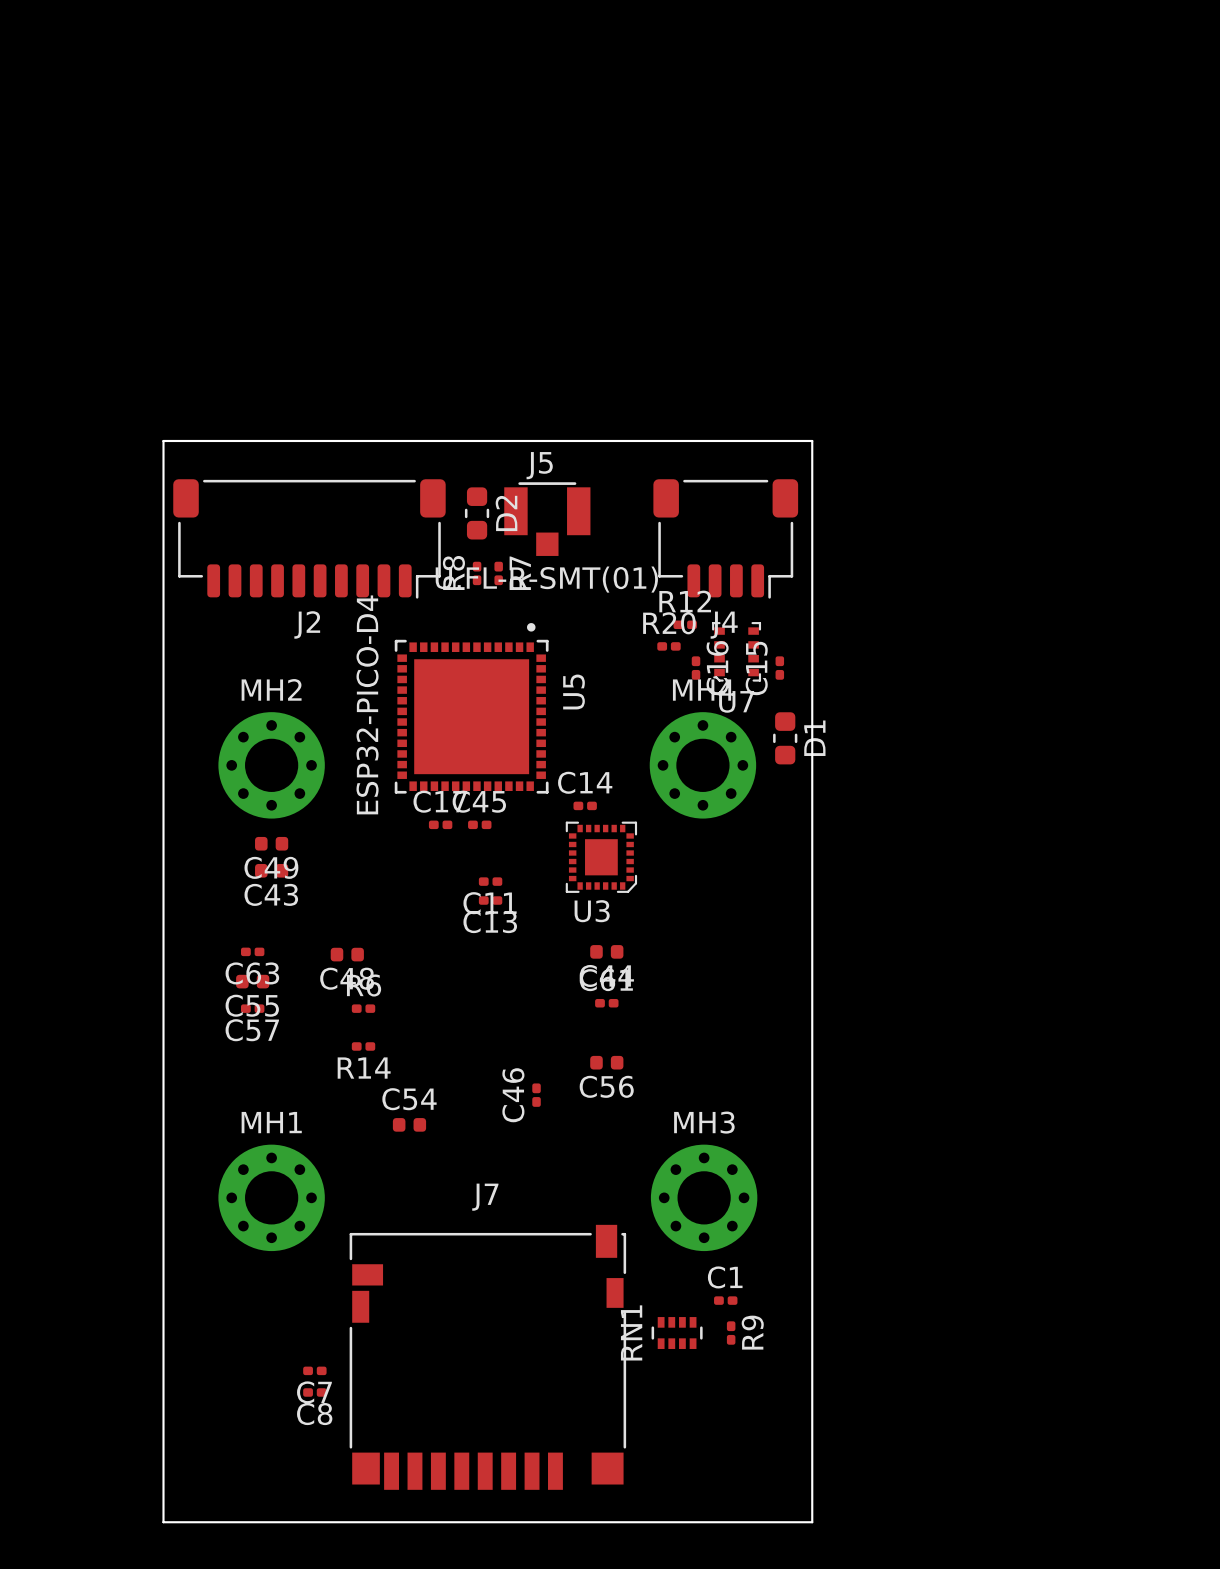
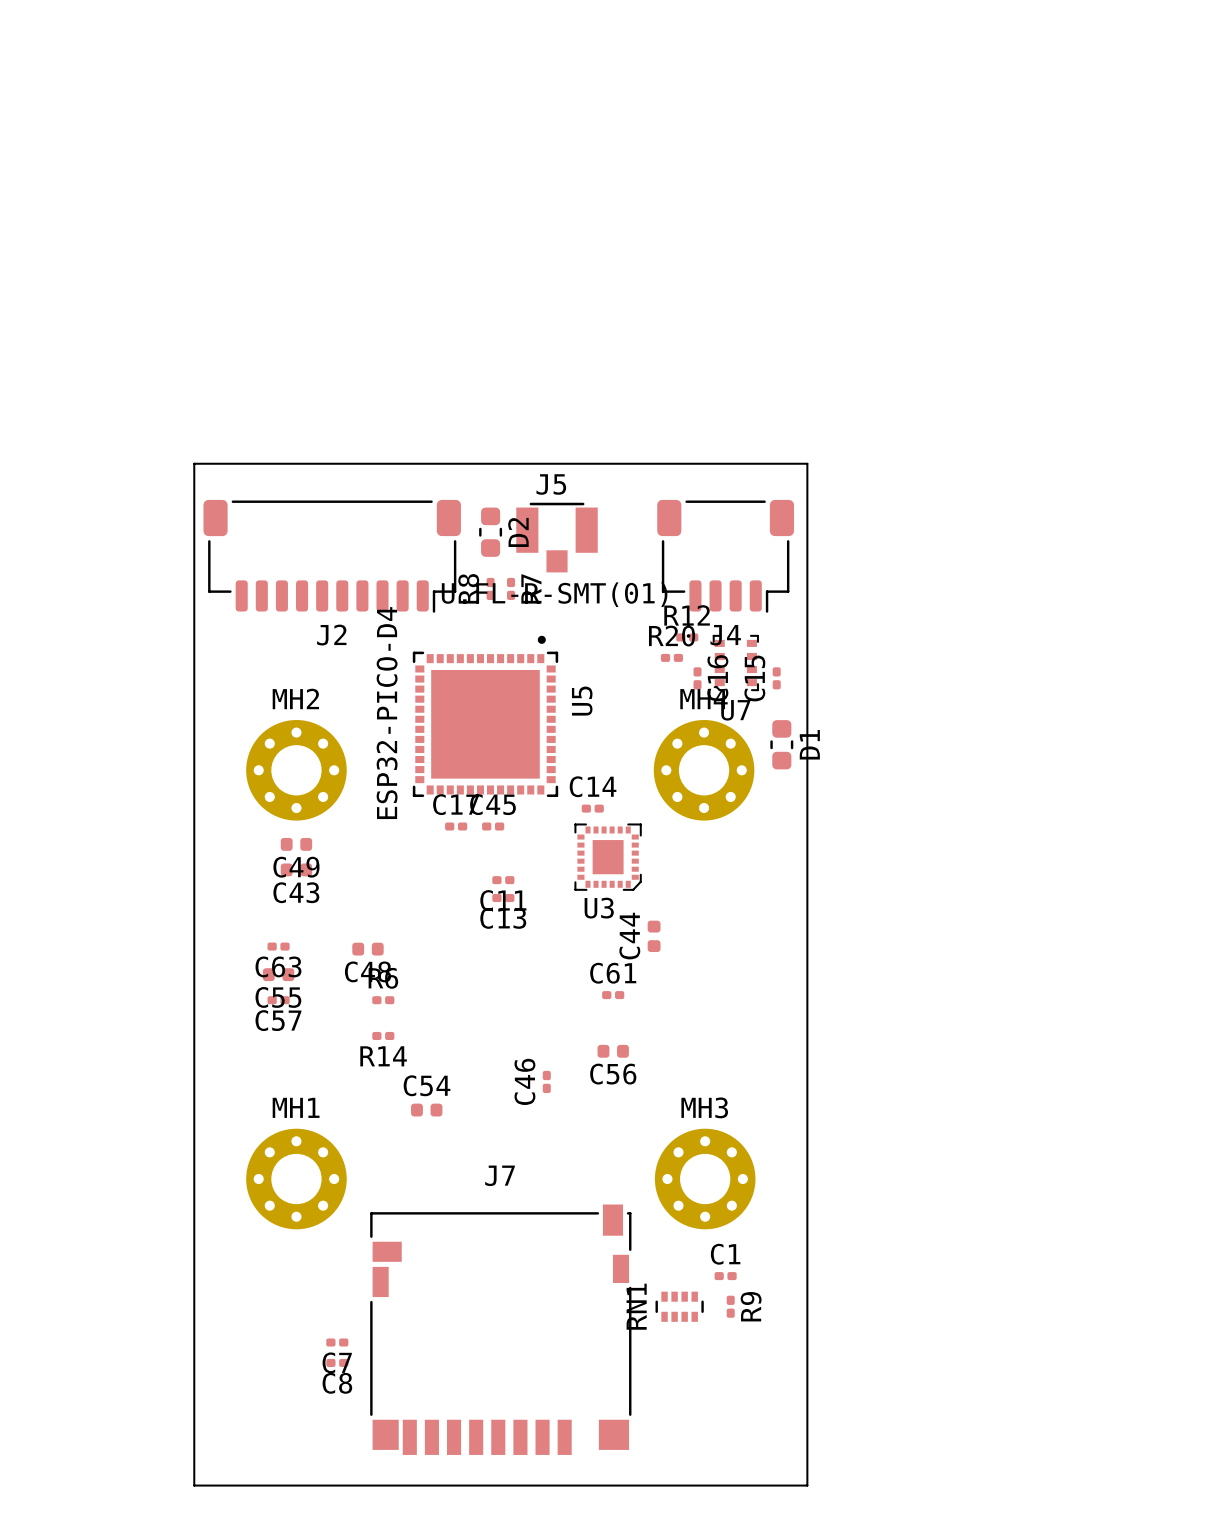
C44 rotation: 0° (606, 951) -> 90° clockwise (654, 936)
C44 position: (606, 951) -> (654, 936)

